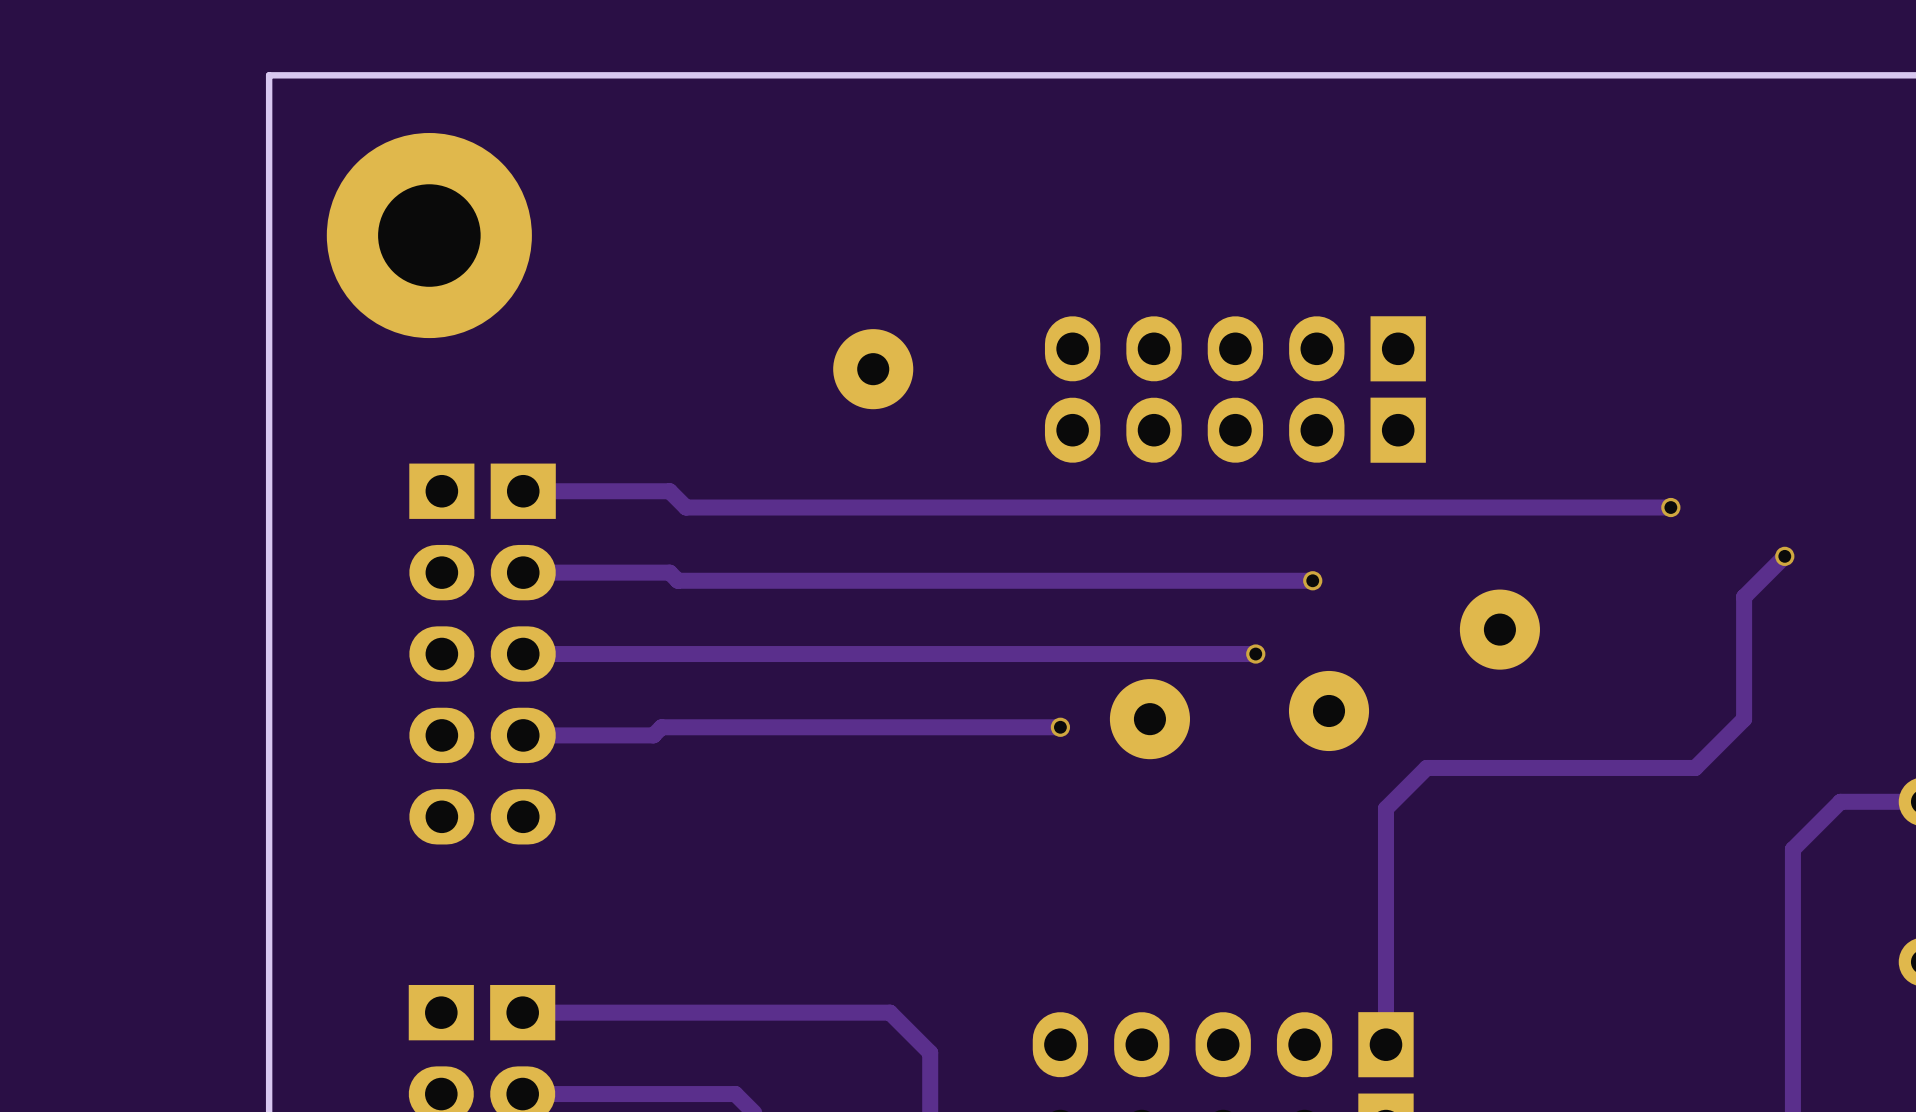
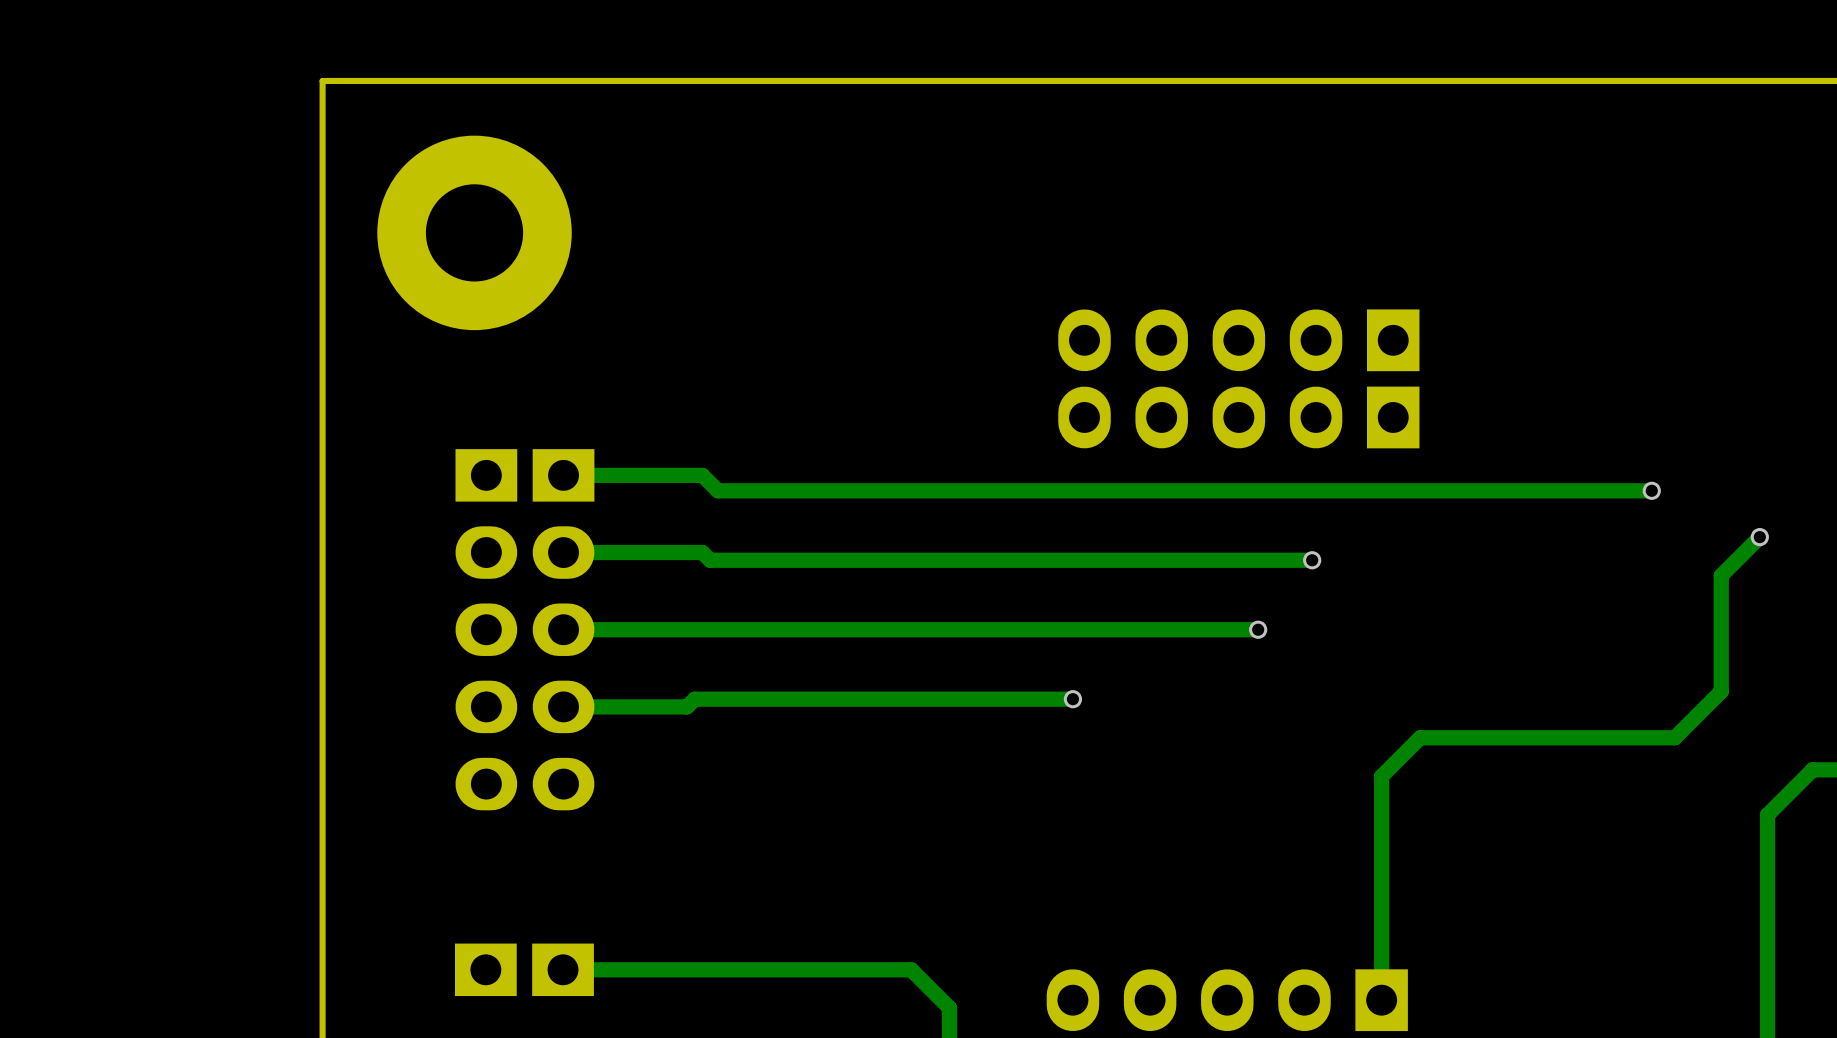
part: (873, 369) -> none
part: (1499, 629) -> none
part: (1329, 710) -> none
part: (1149, 719) -> none

